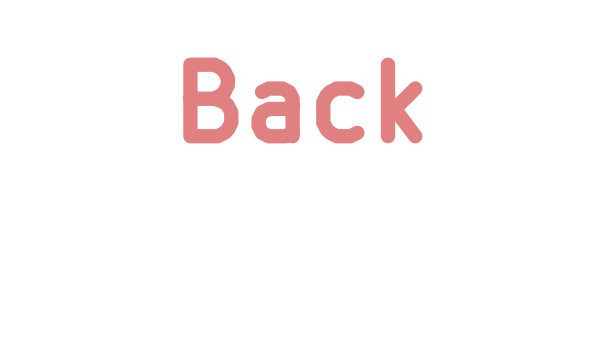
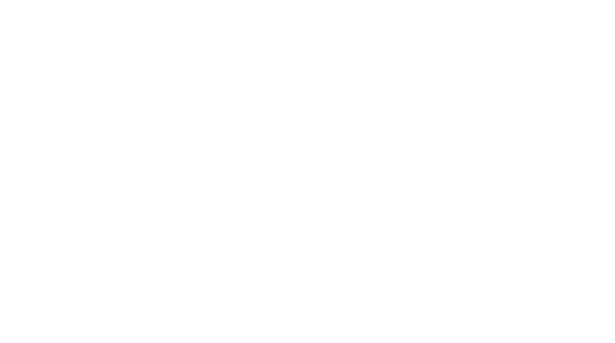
text: Back (302, 100) -> none

